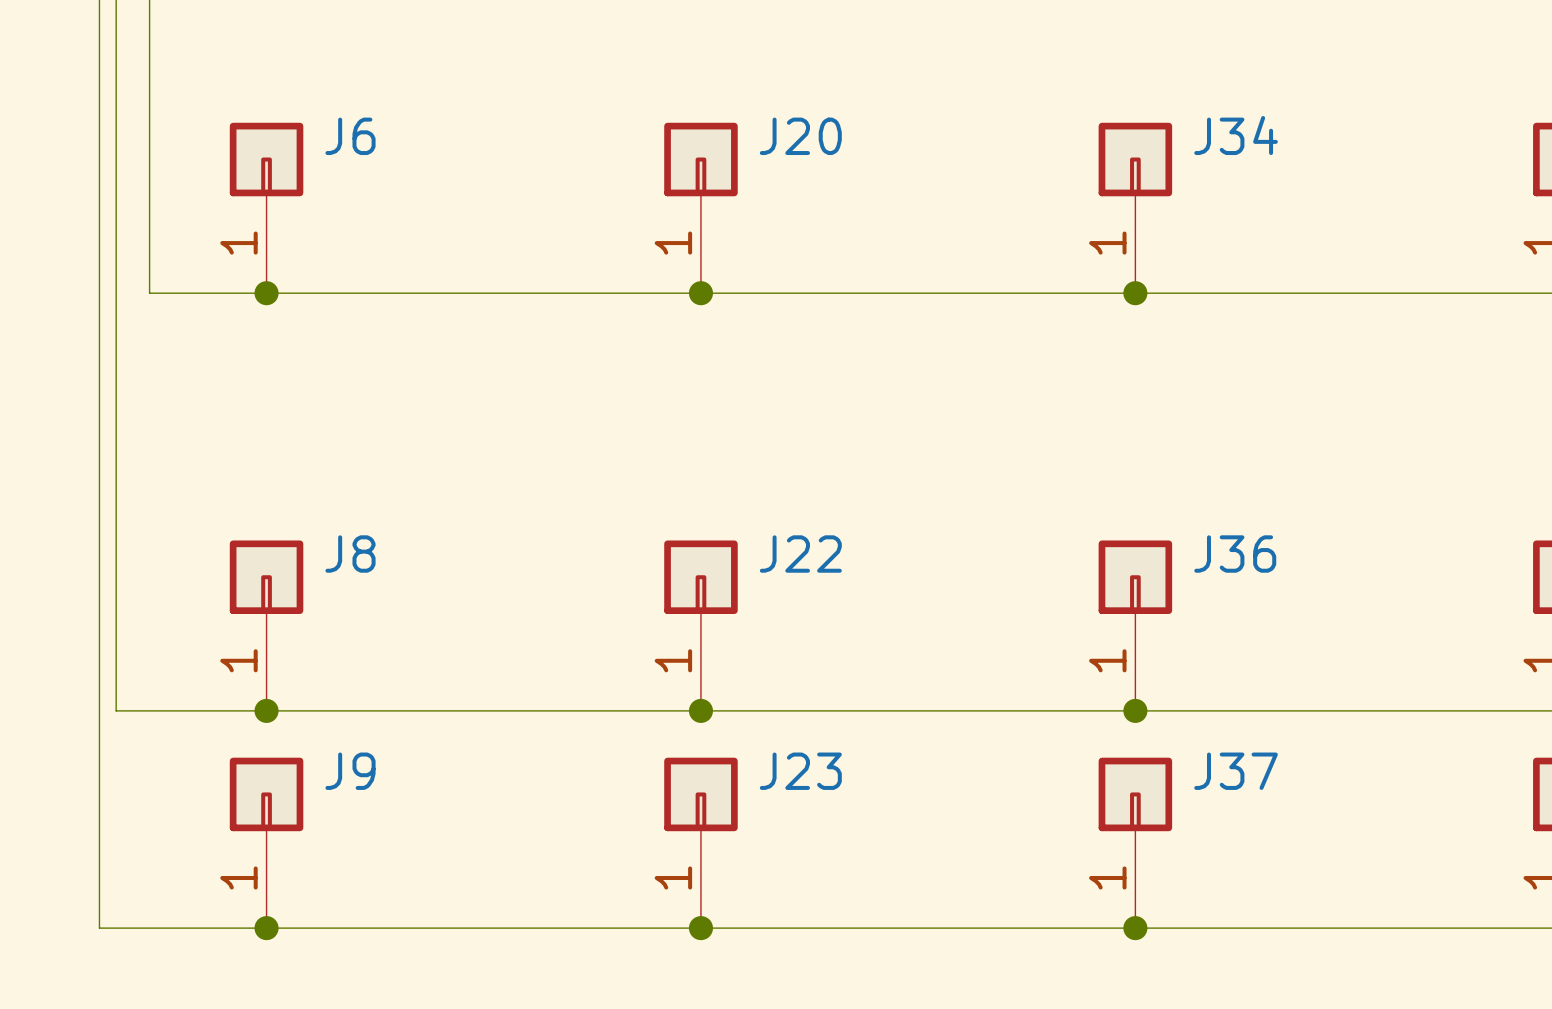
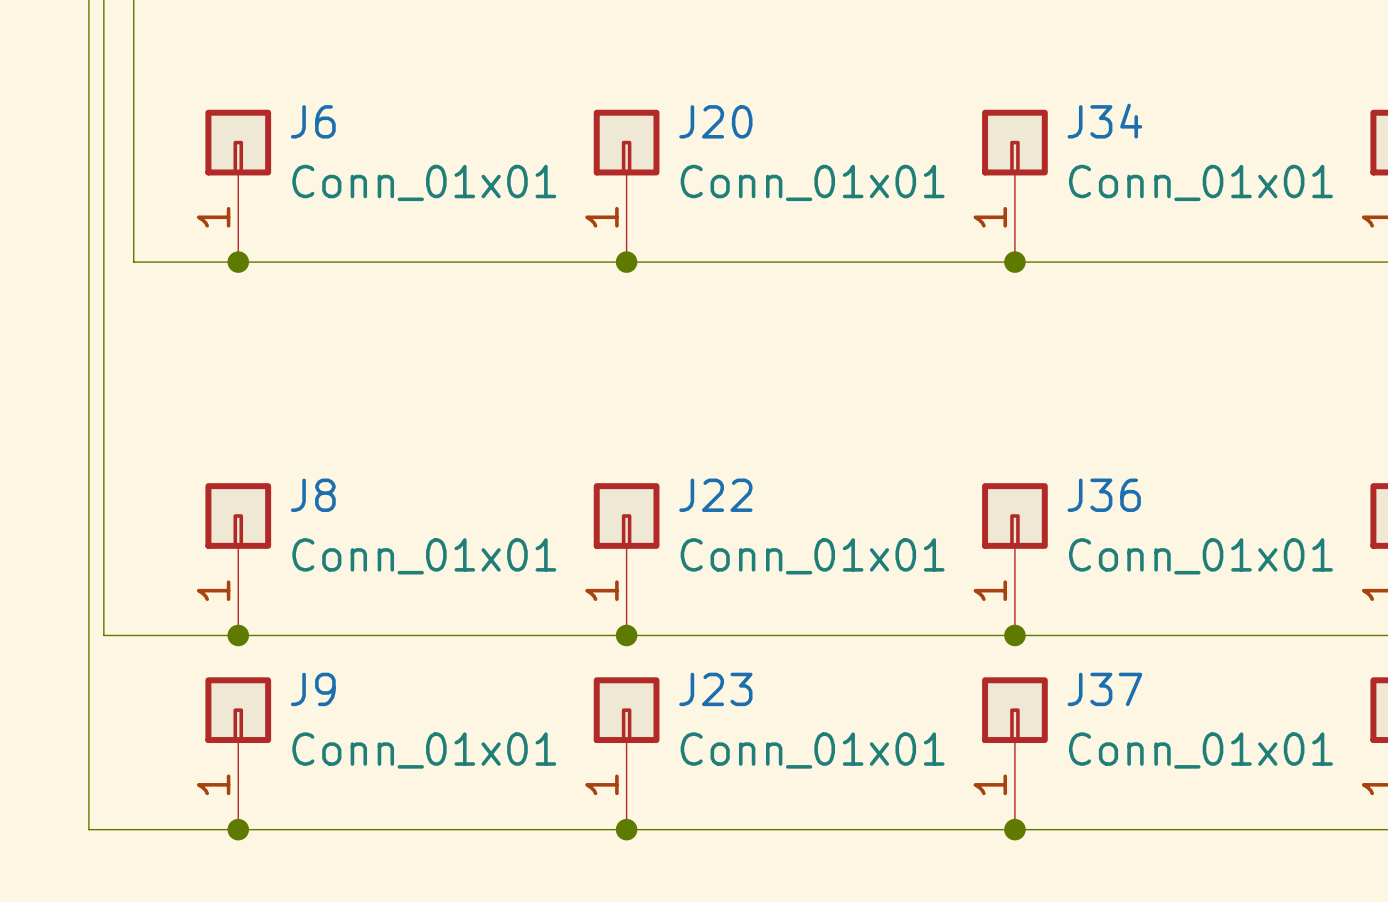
J6 value: none -> Conn_01x01 (424, 182)
J20 value: none -> Conn_01x01 (812, 182)
J34 value: none -> Conn_01x01 (1200, 182)
J8 value: none -> Conn_01x01 (424, 556)
J22 value: none -> Conn_01x01 (812, 556)
J36 value: none -> Conn_01x01 (1200, 556)
J9 value: none -> Conn_01x01 (424, 750)
J23 value: none -> Conn_01x01 (812, 750)
J37 value: none -> Conn_01x01 (1200, 750)

